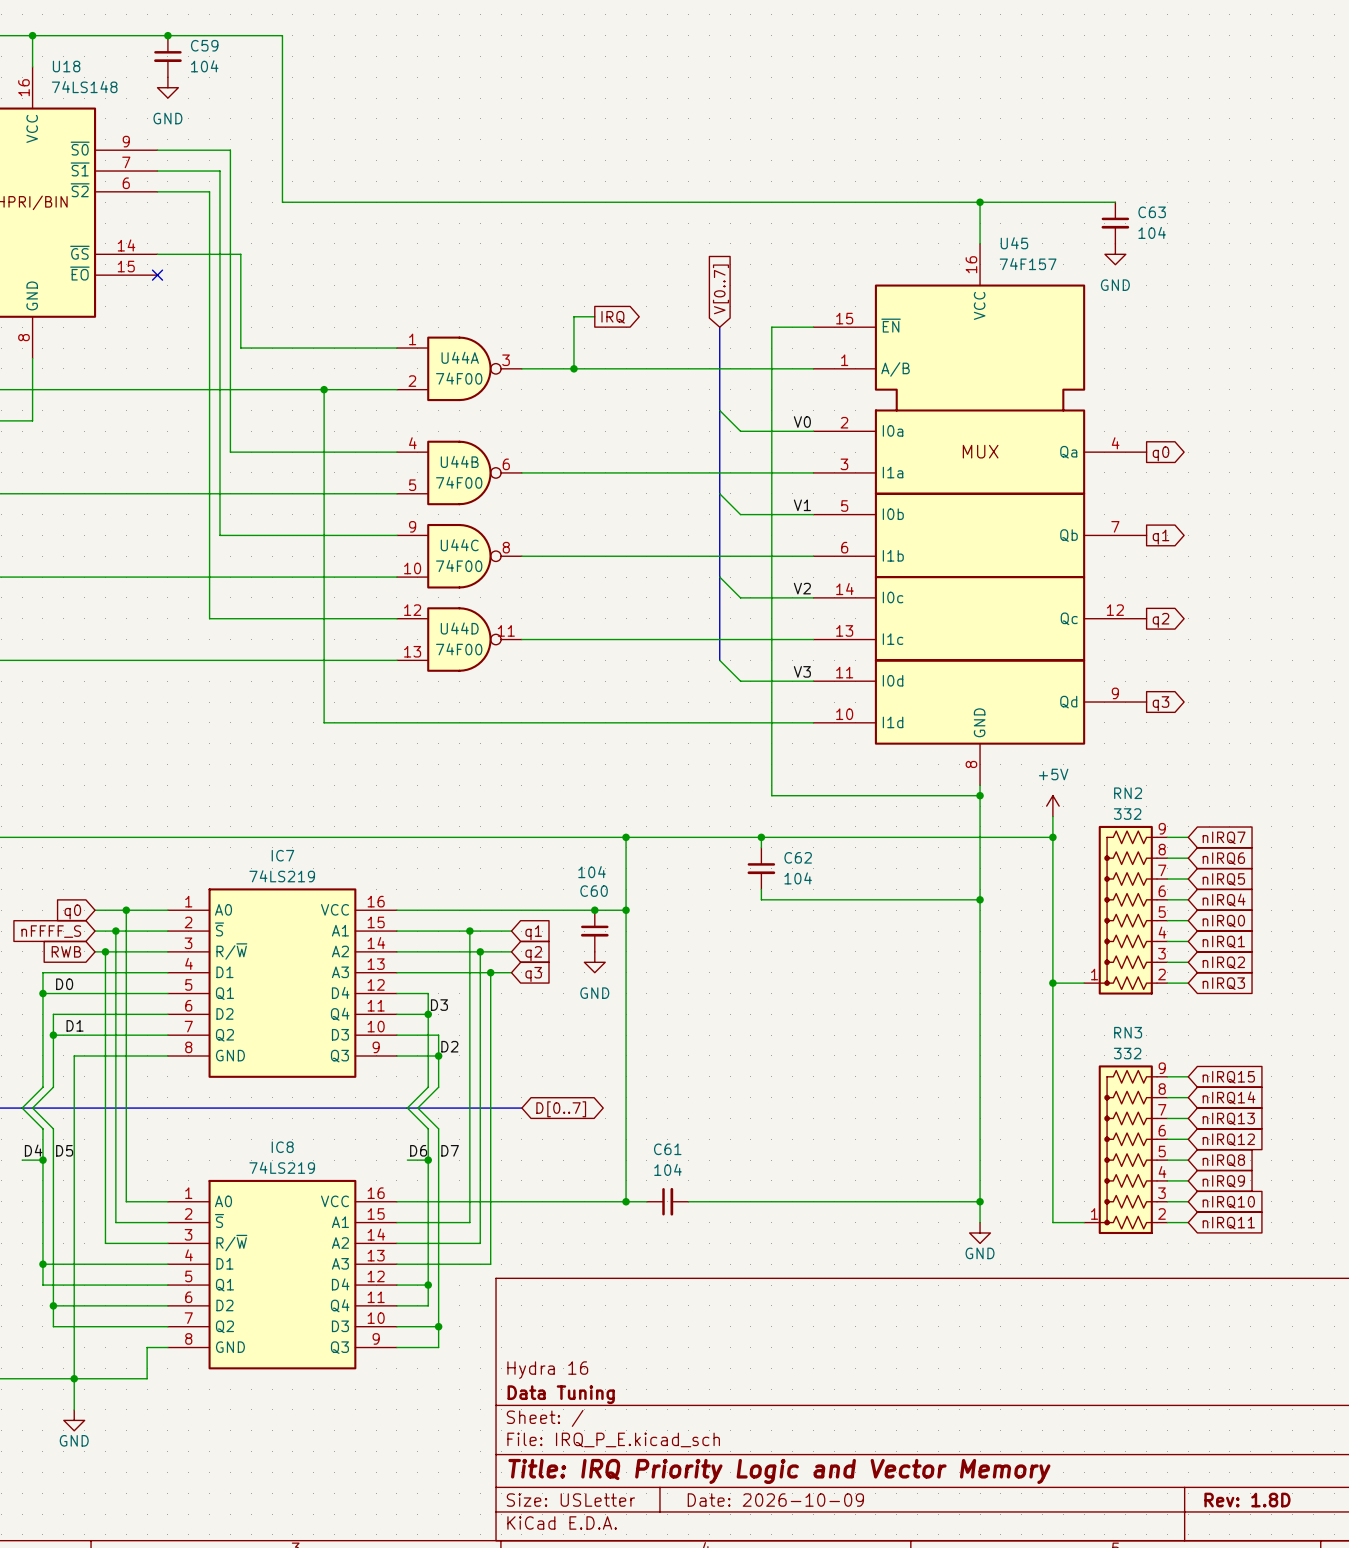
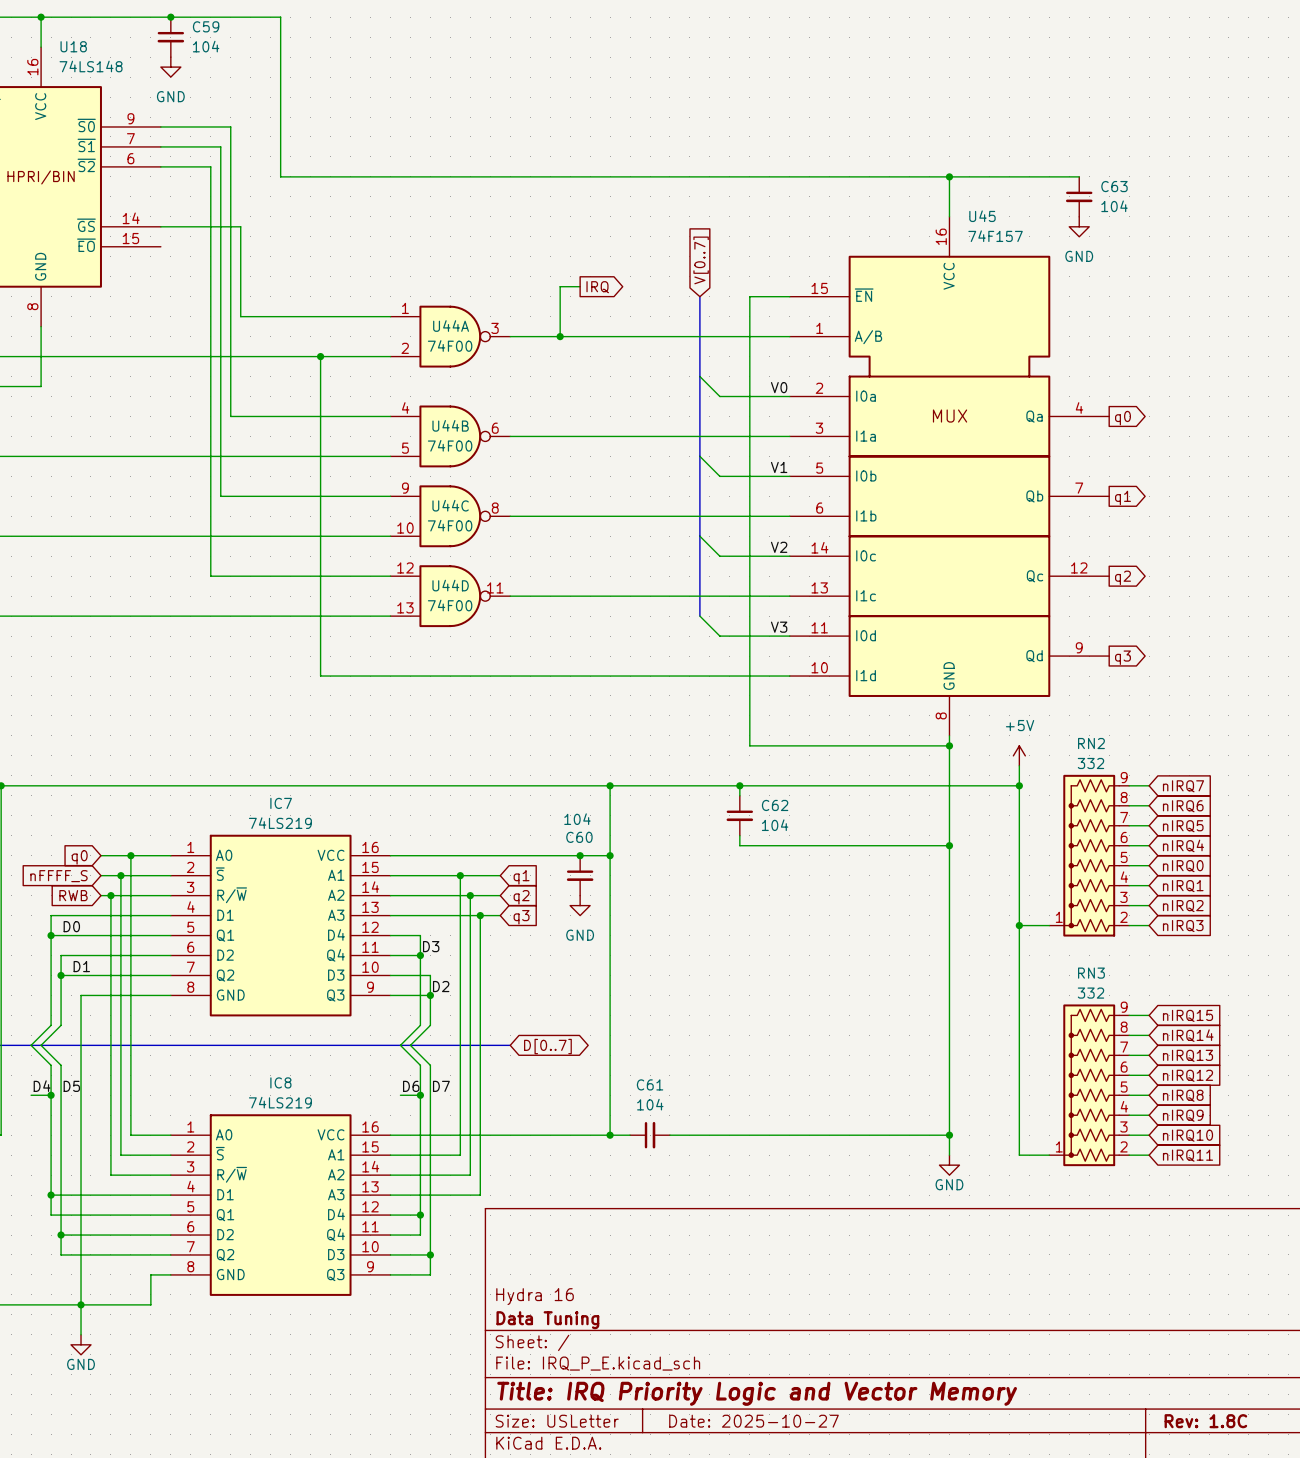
no-connect mark: (157, 275) -> none
title block: Date: 2026-10-09 (775, 1500) -> Date: 2025-10-27 (754, 1421)
title block: Rev: 1.8D (1247, 1500) -> Rev: 1.8C (1205, 1421)

